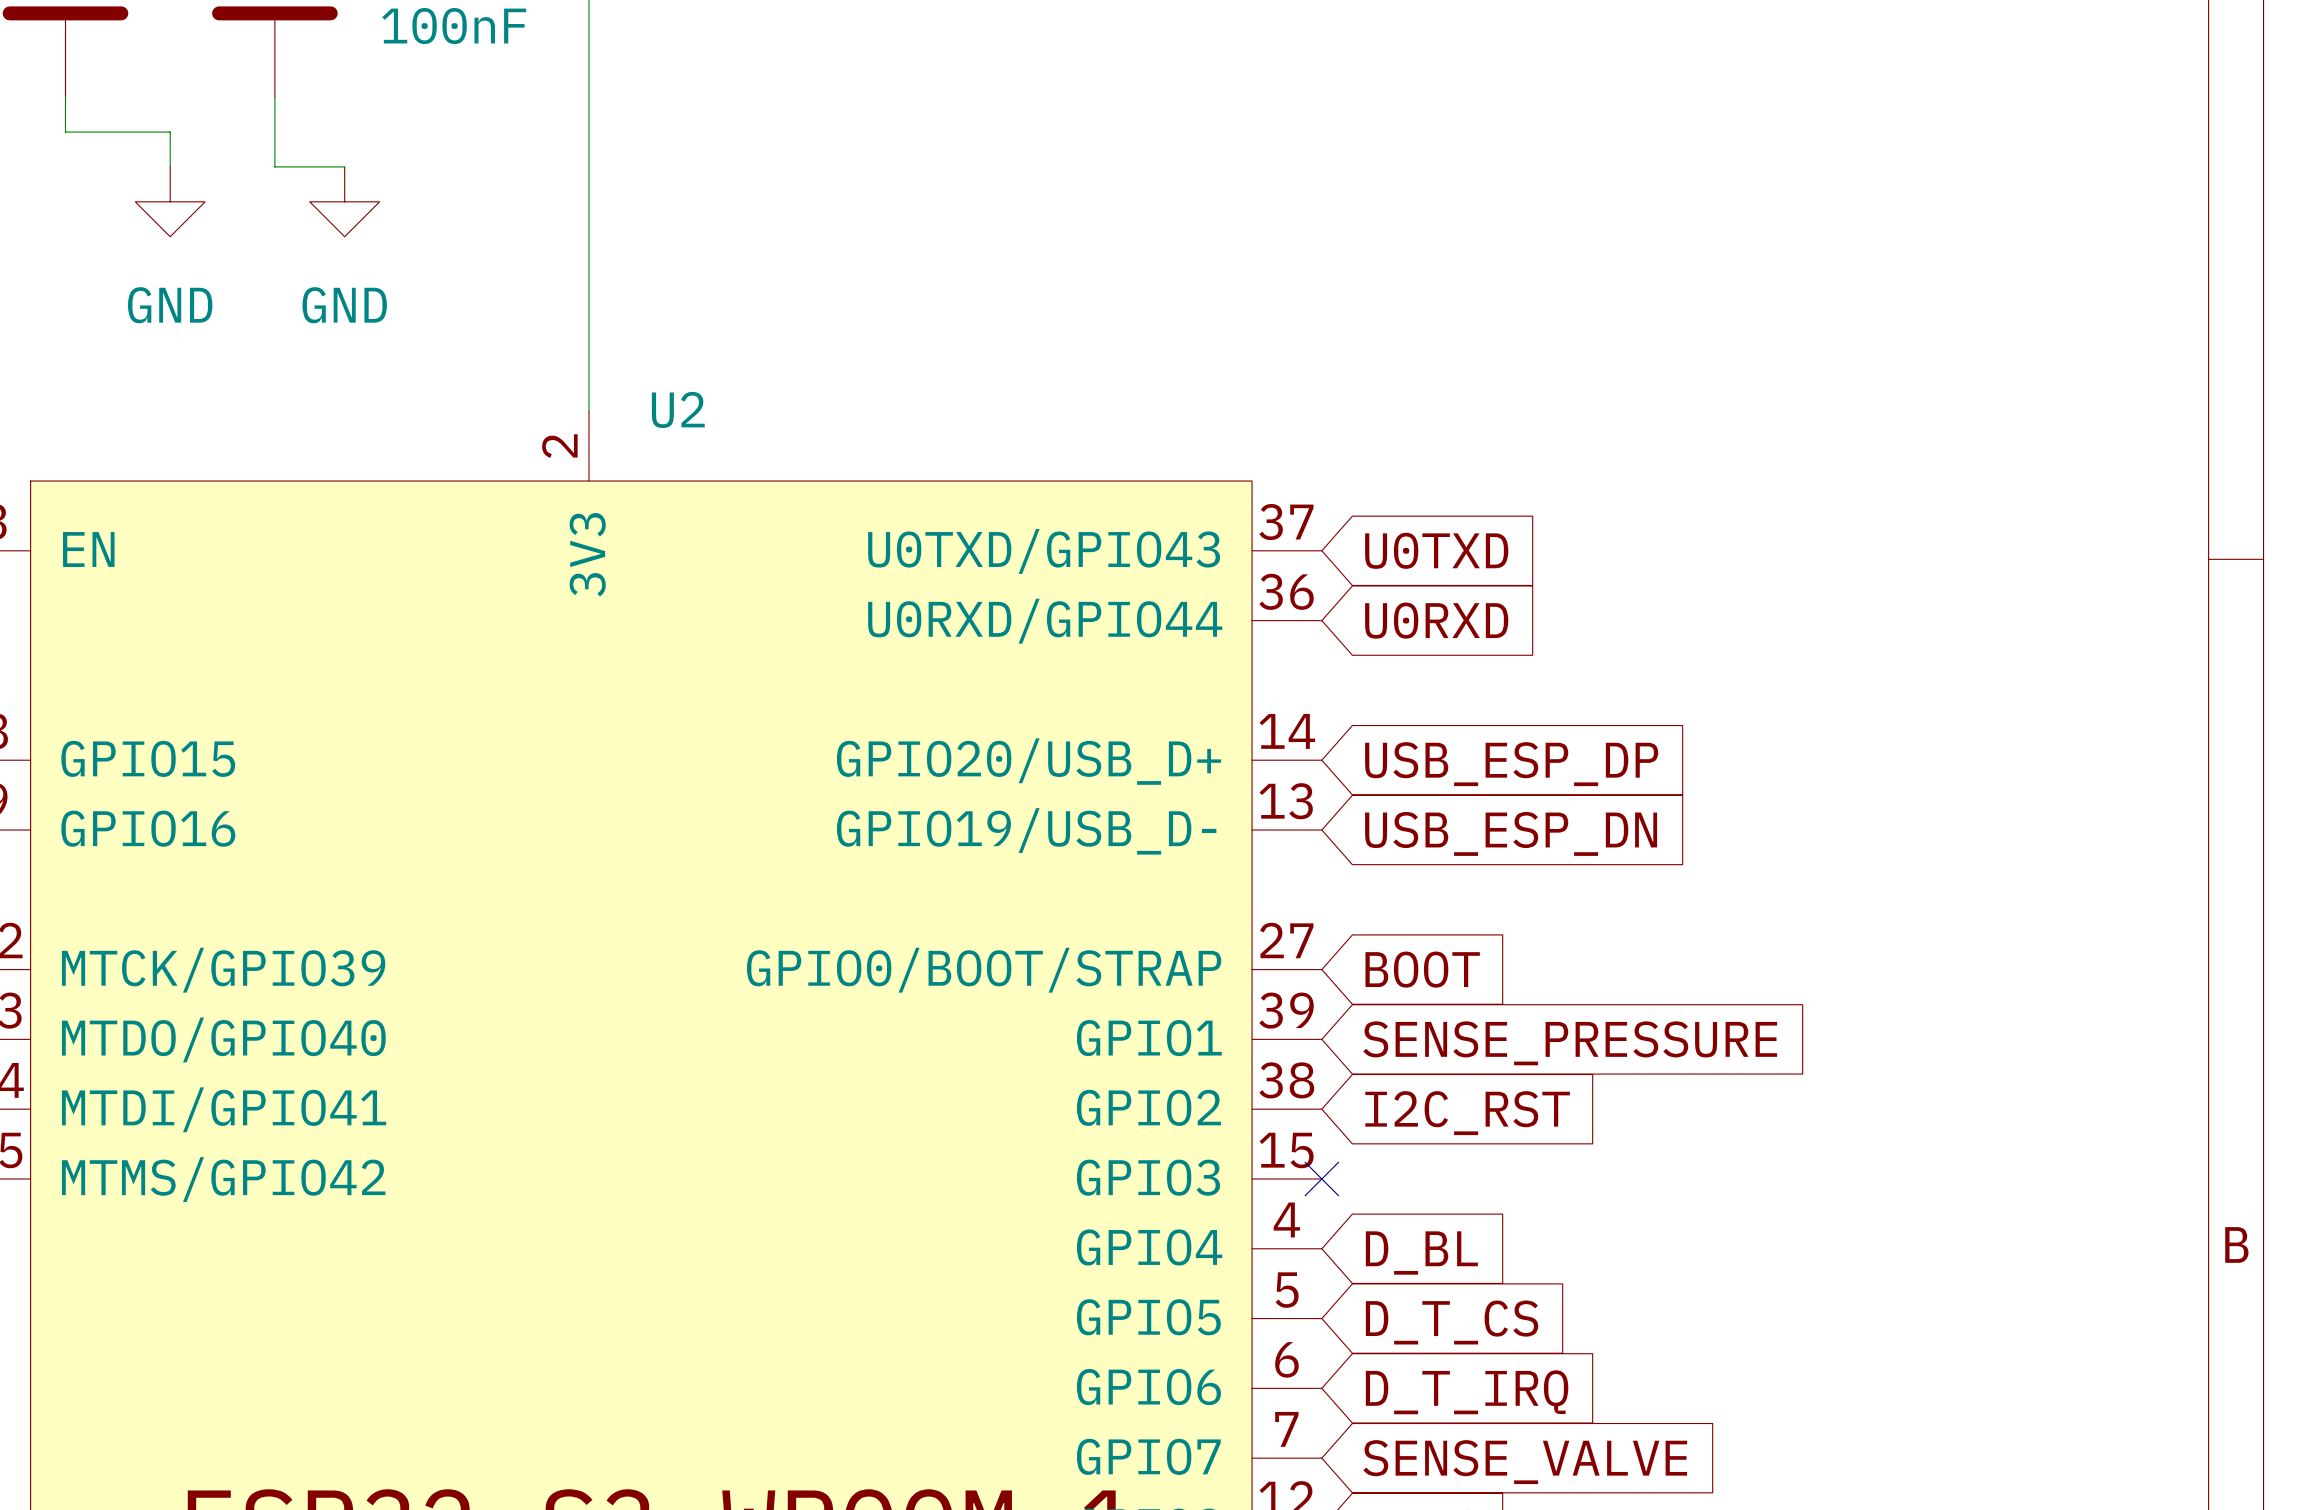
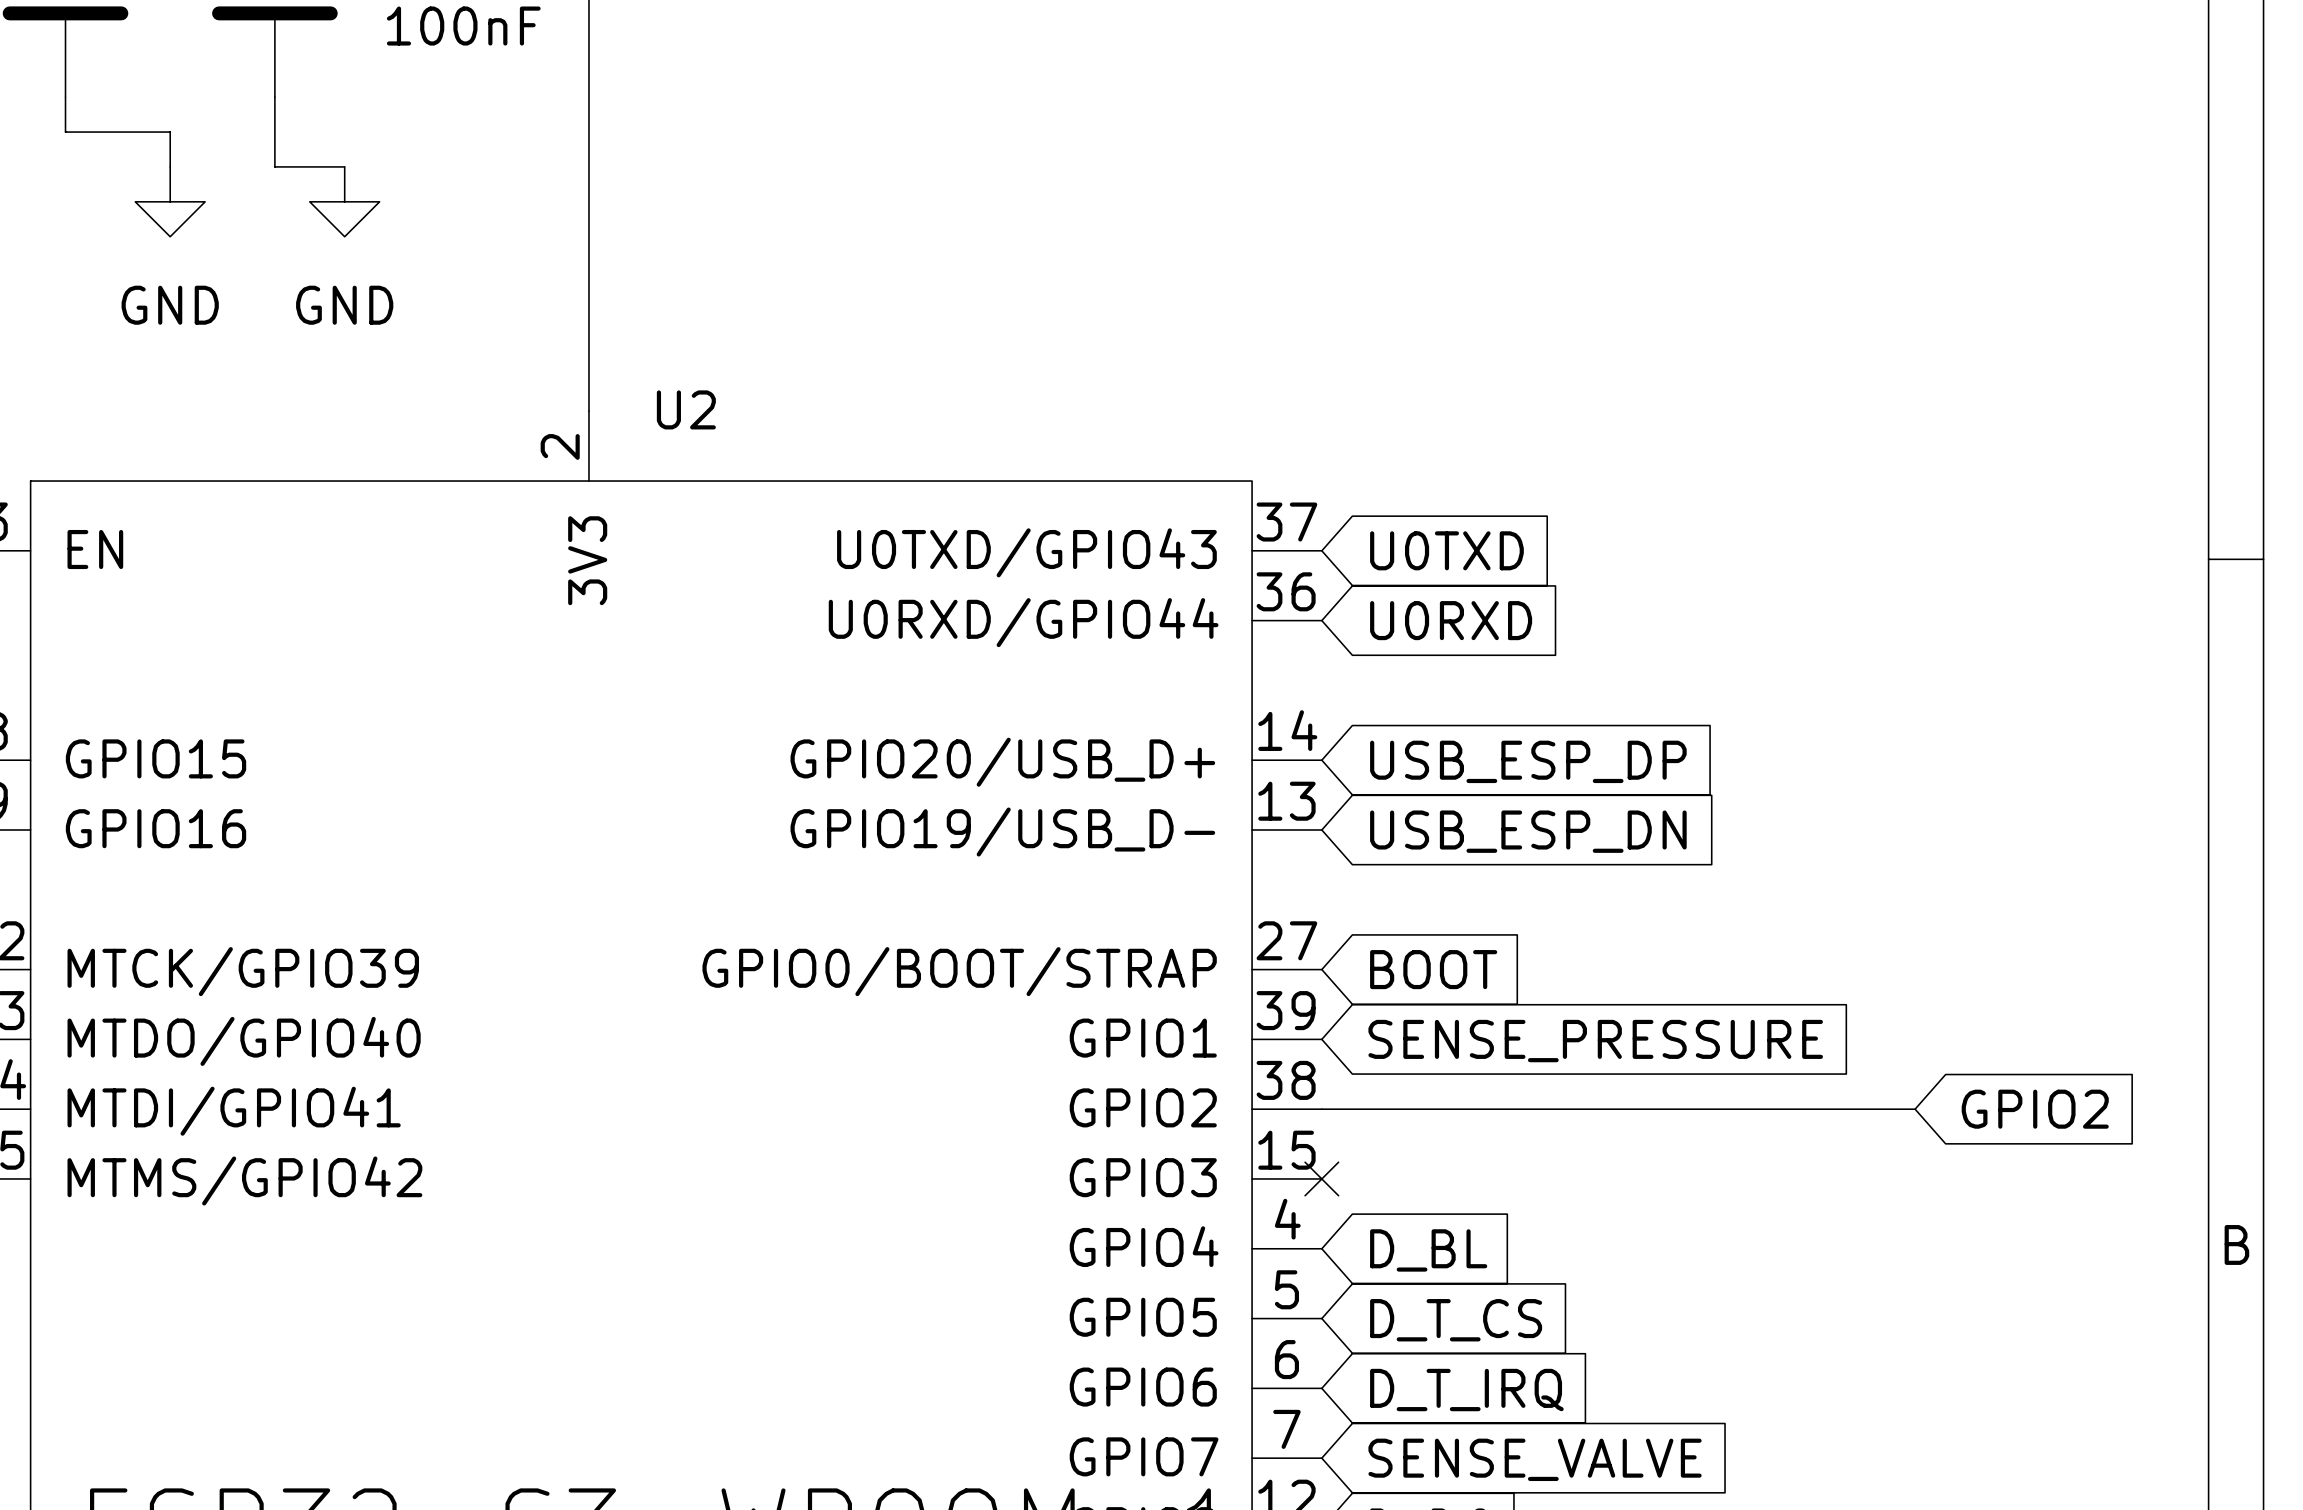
wire: none -> (1321, 1109) (1915, 1109)
global label: none -> GPIO2 (2035, 1109)
global label: I2C_RST (1467, 1113) -> none

